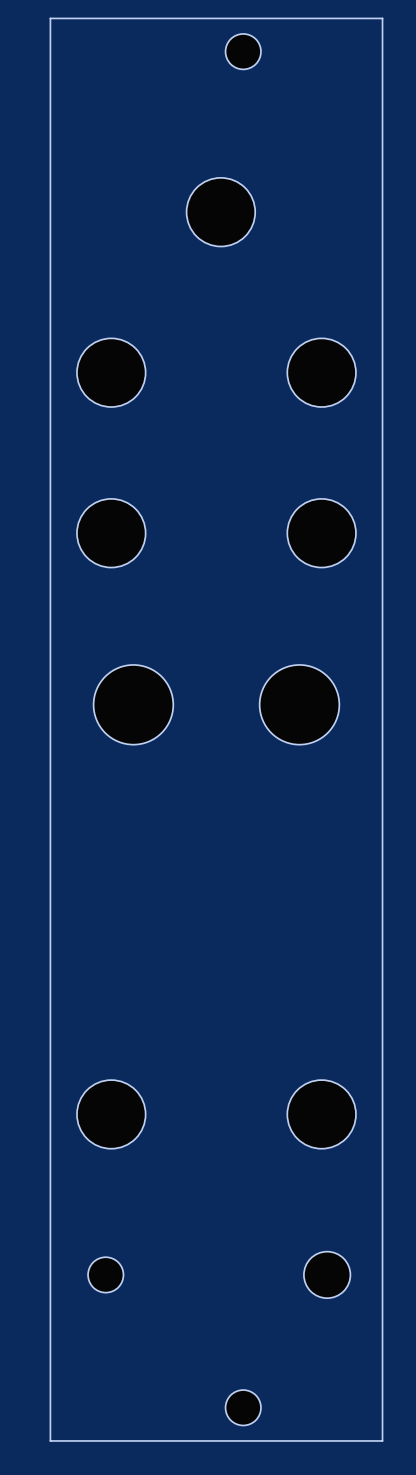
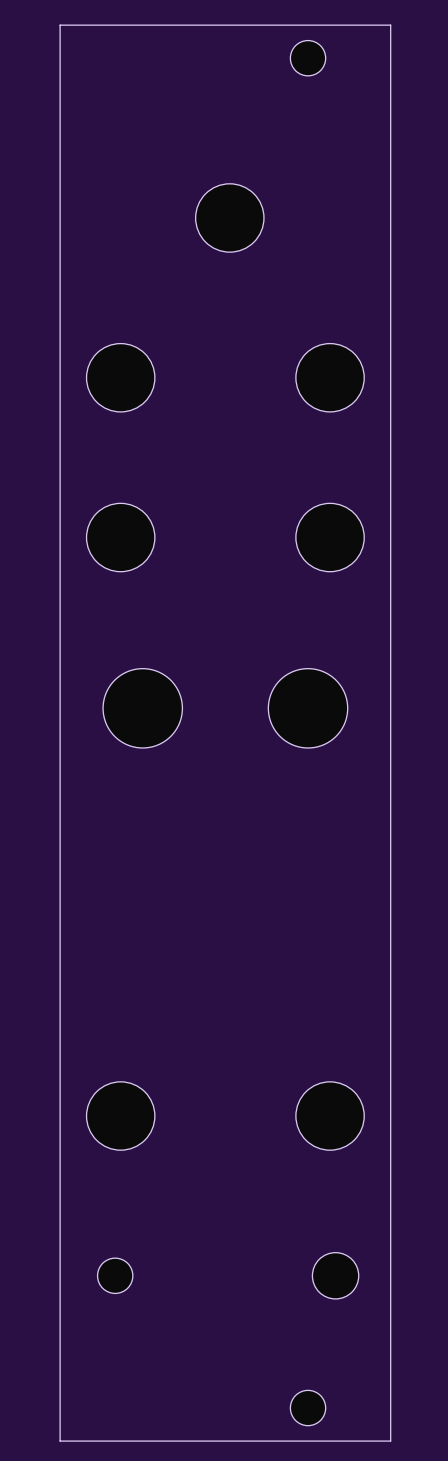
part position: (243, 51) -> (308, 58)
part position: (243, 1407) -> (308, 1408)

